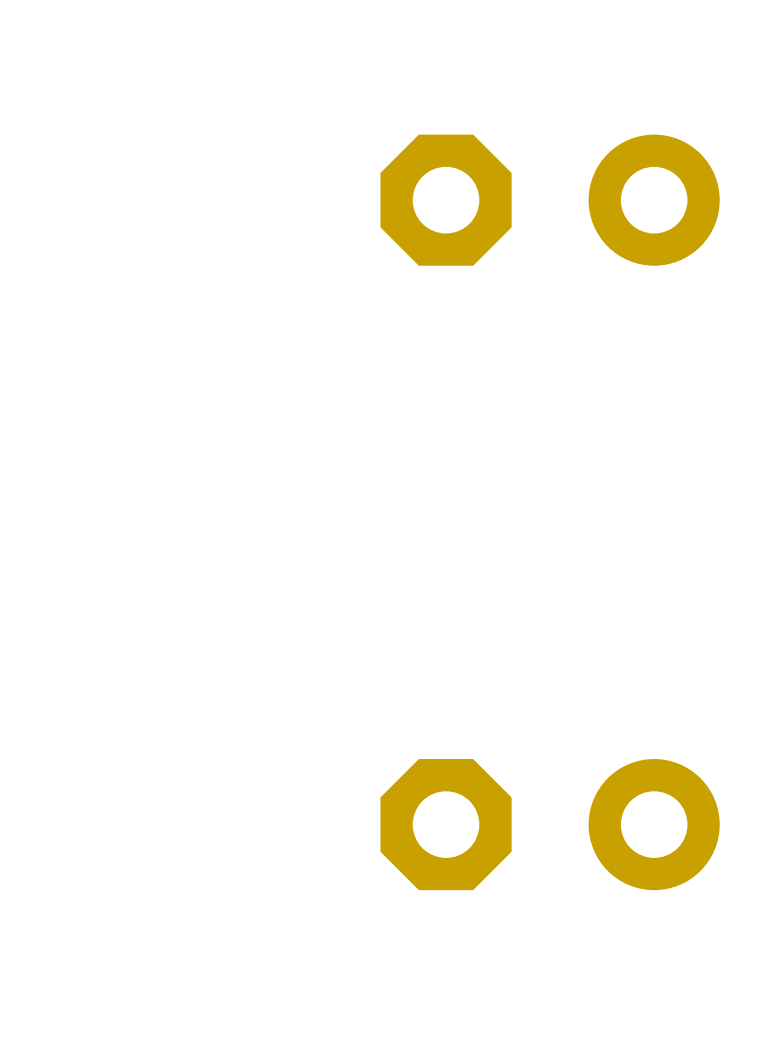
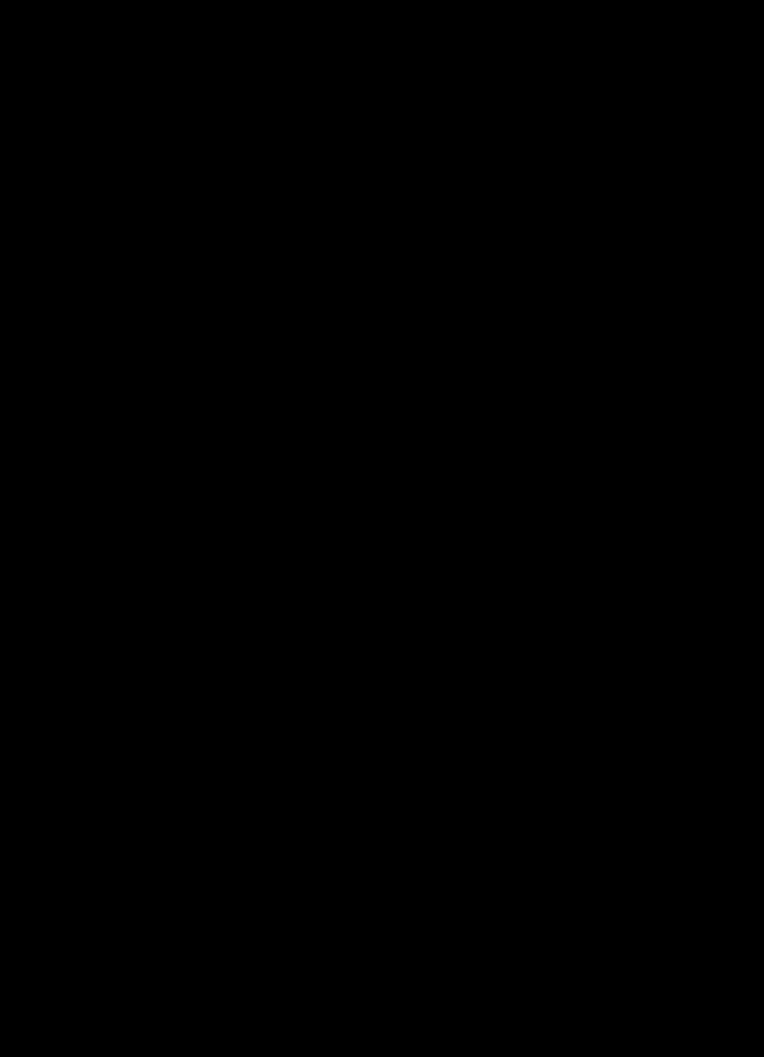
part: (550, 200) -> none
part: (550, 824) -> none

